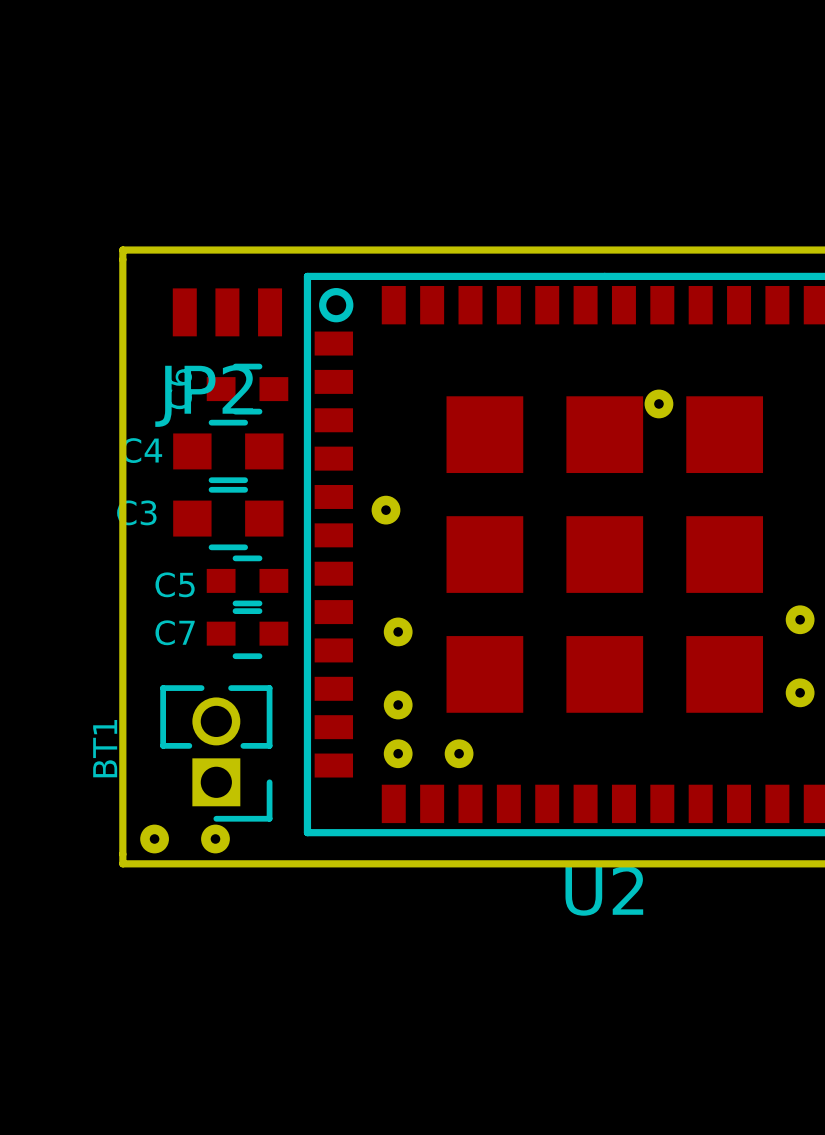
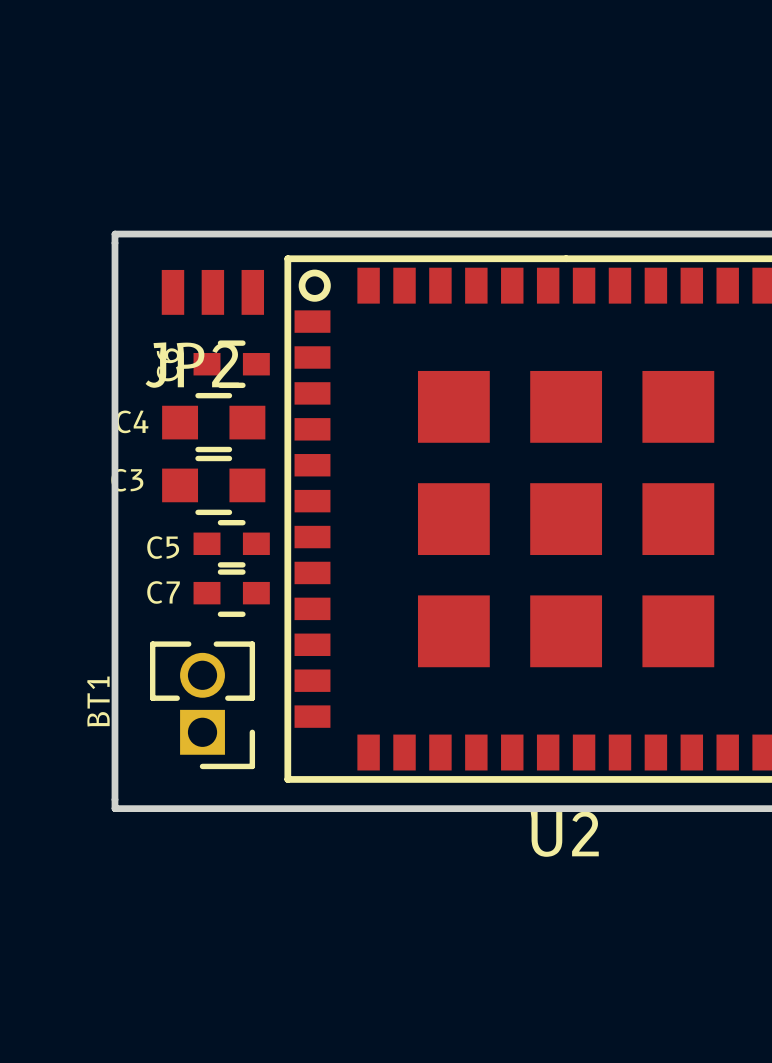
part: (658, 403) -> none
part: (386, 510) -> none
part: (800, 619) -> none
part: (398, 631) -> none
part: (800, 692) -> none
part: (398, 705) -> none
part: (398, 753) -> none
part: (459, 753) -> none
part: (154, 838) -> none
part: (215, 838) -> none

